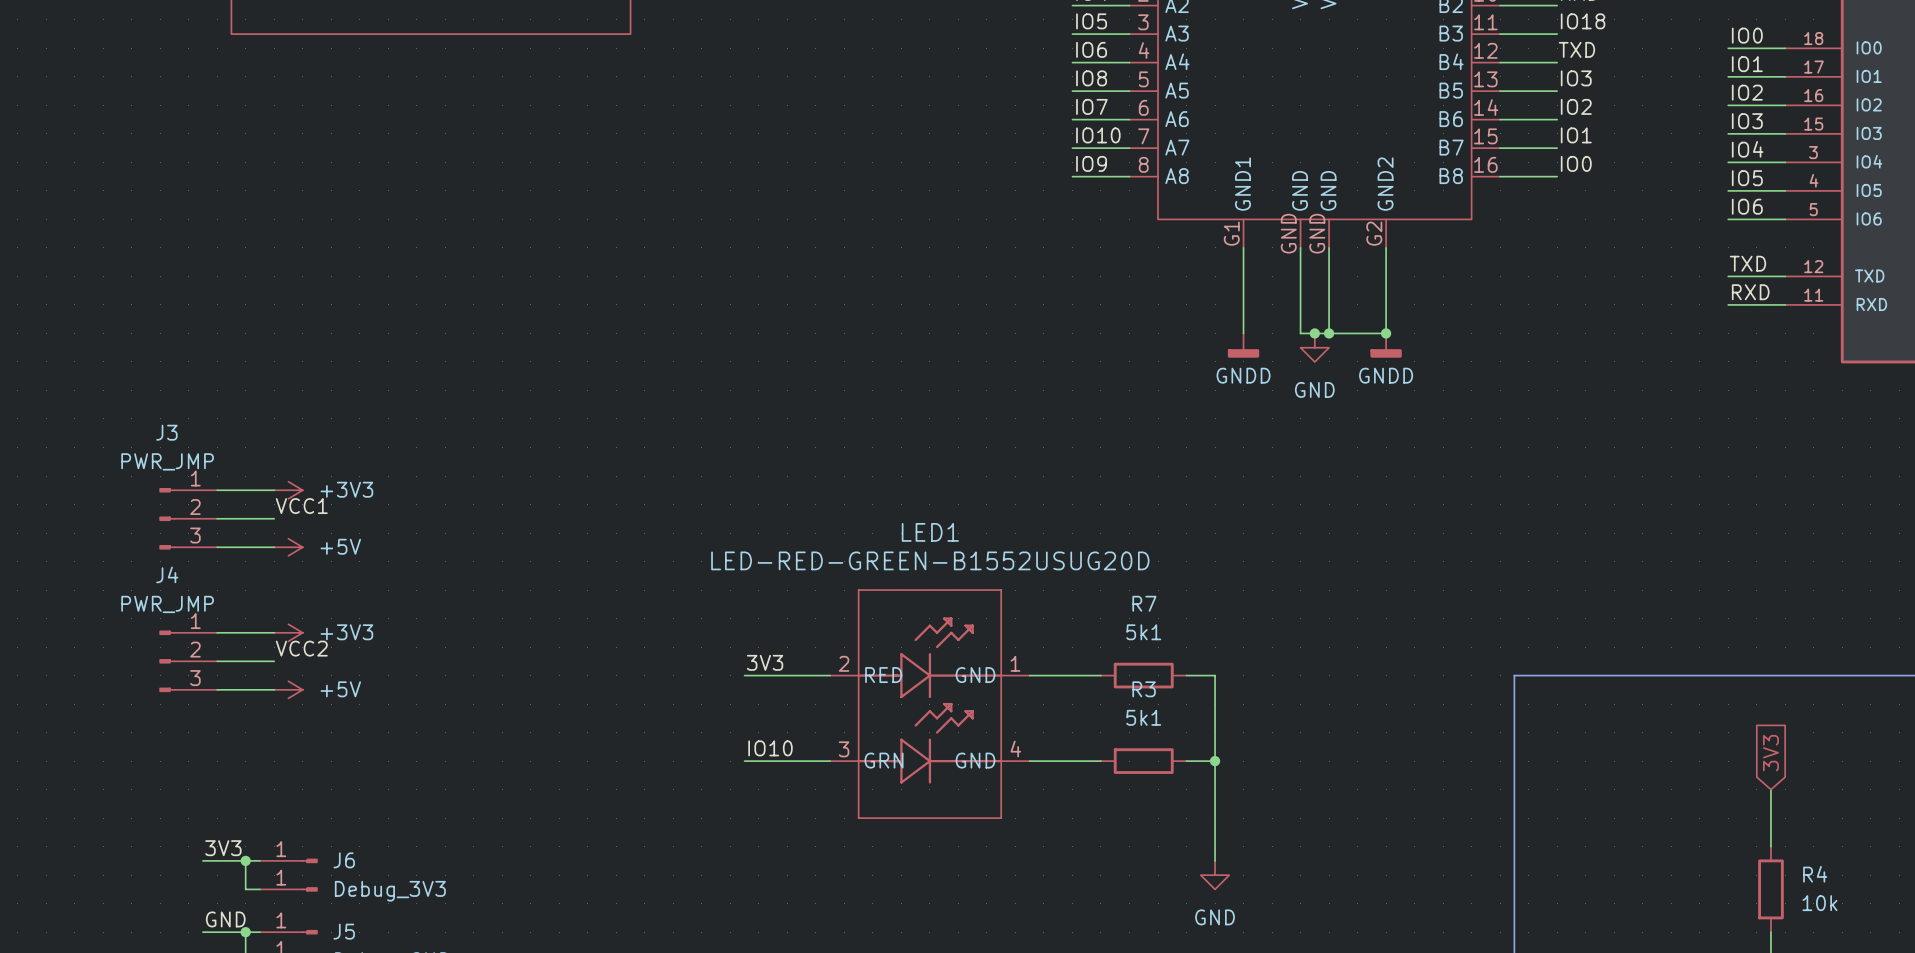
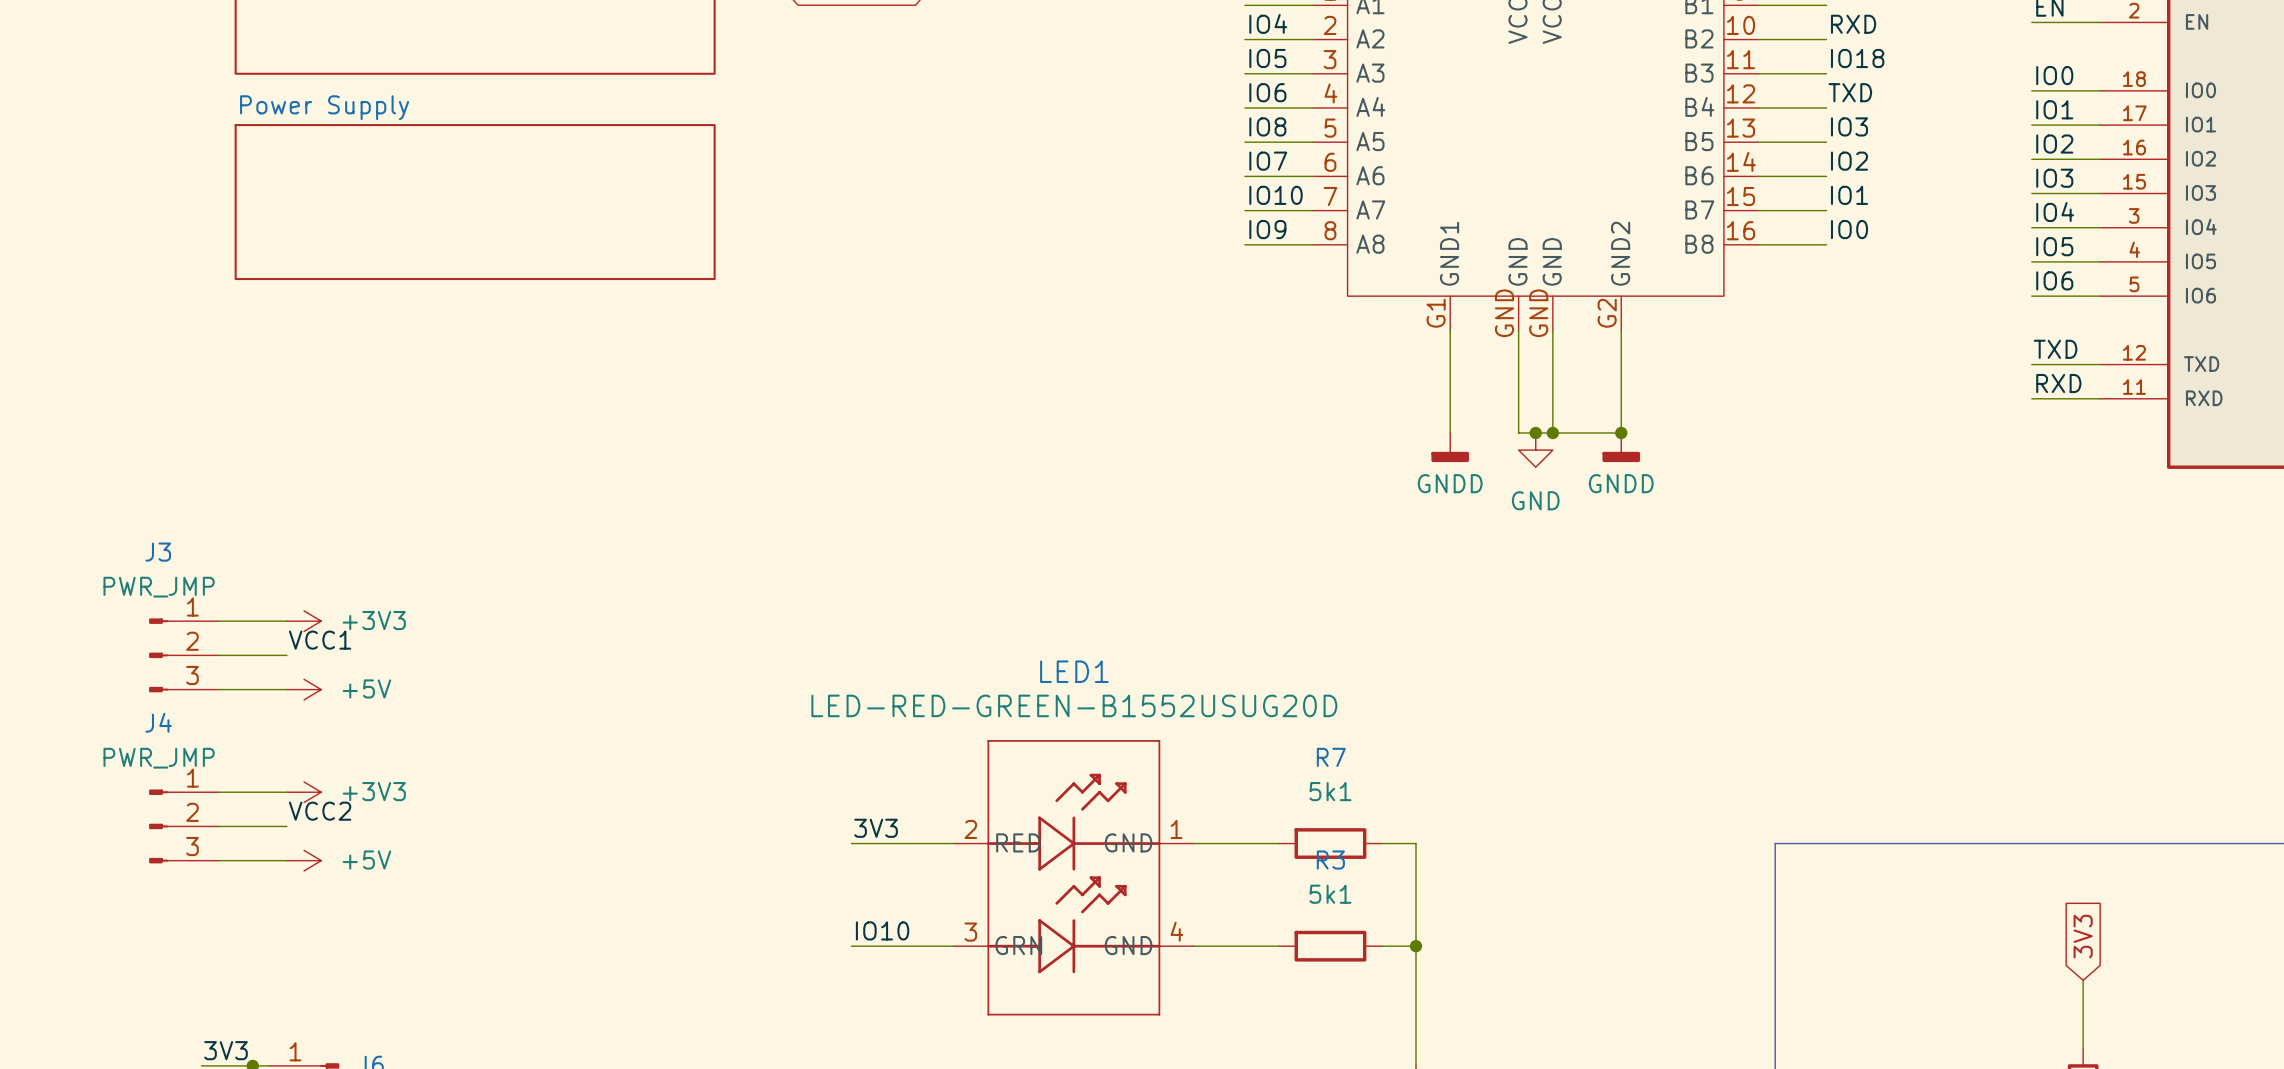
sheet Power Supply: none -> (475, 202)

